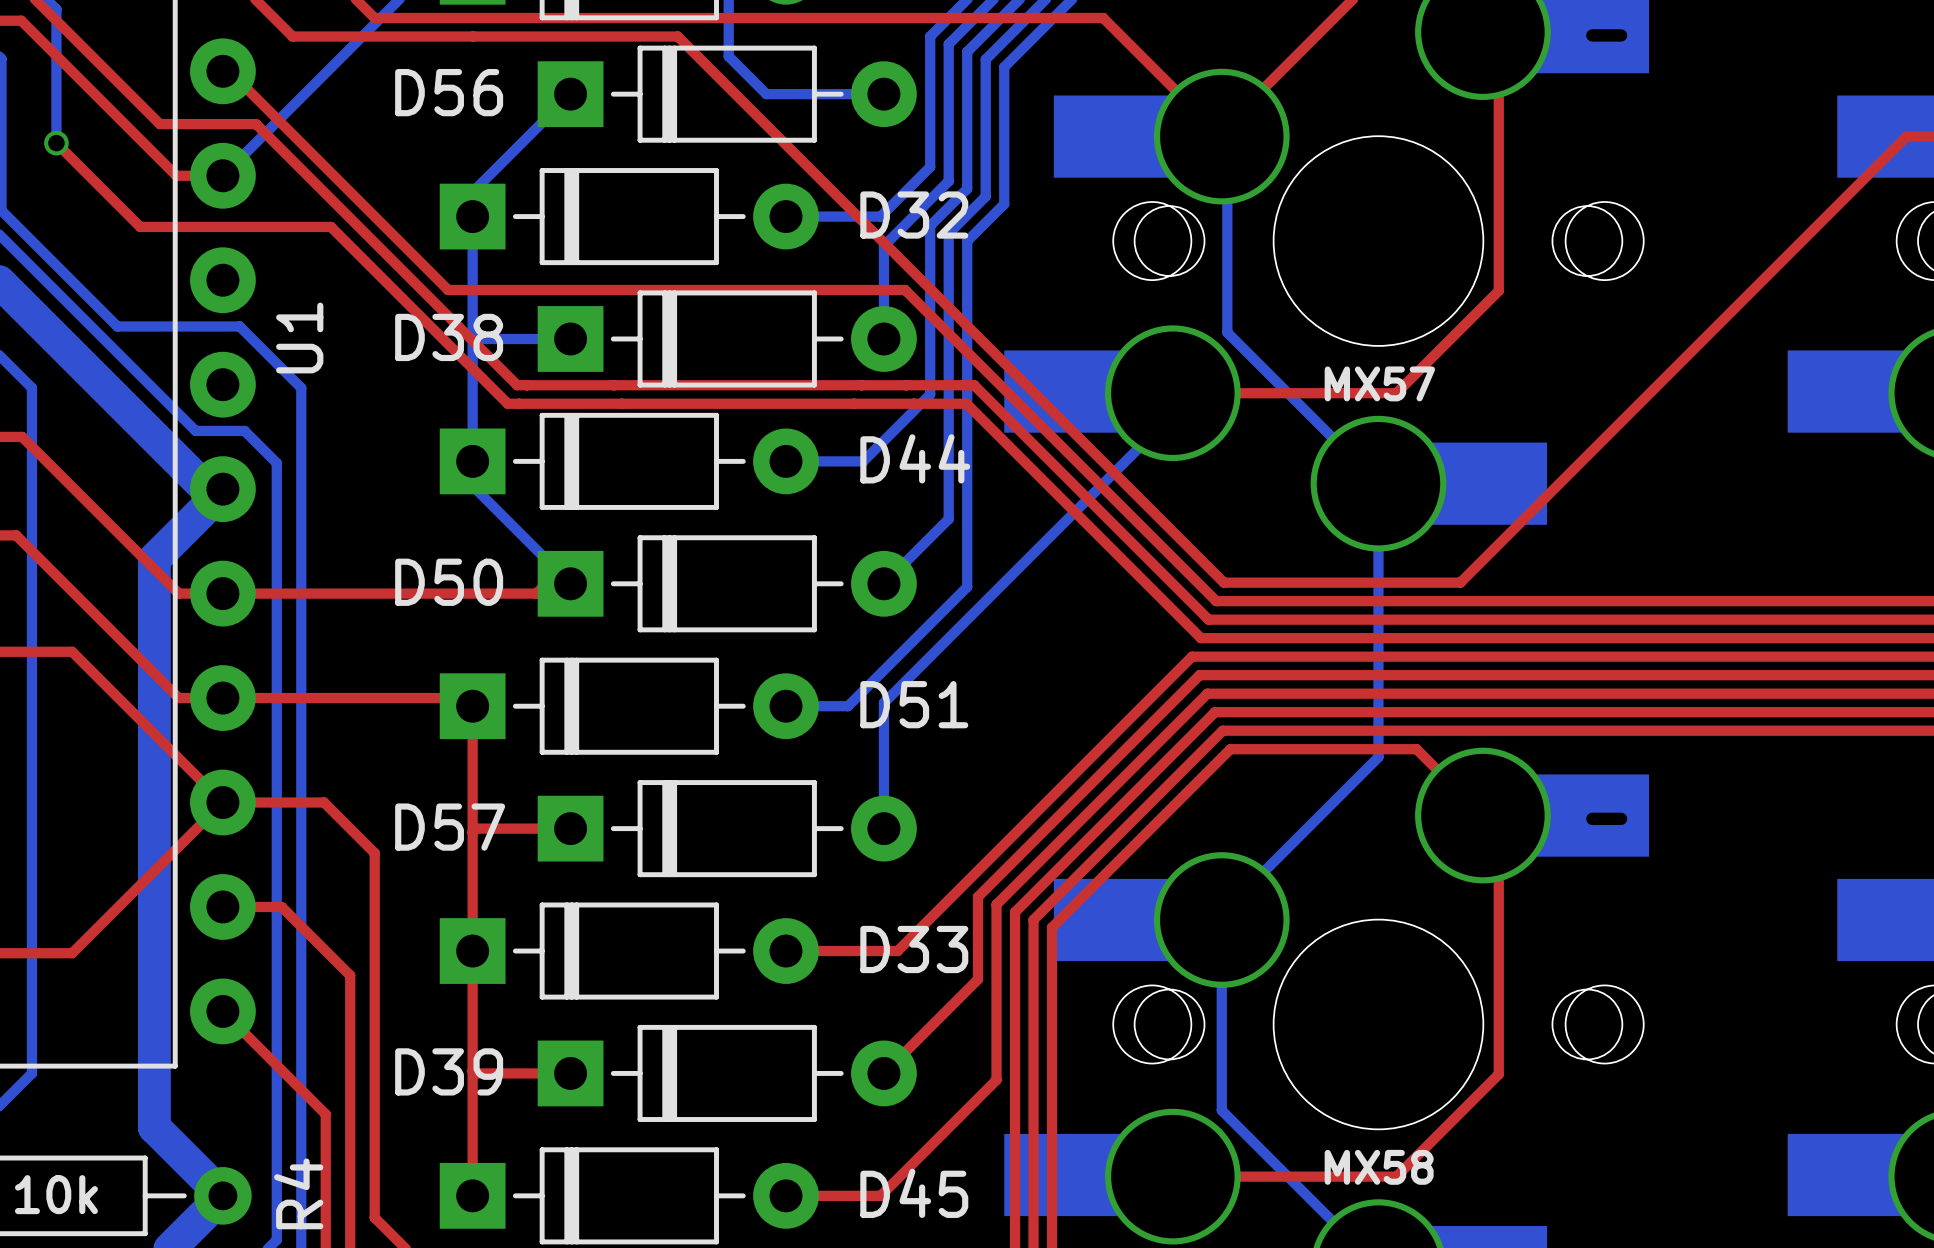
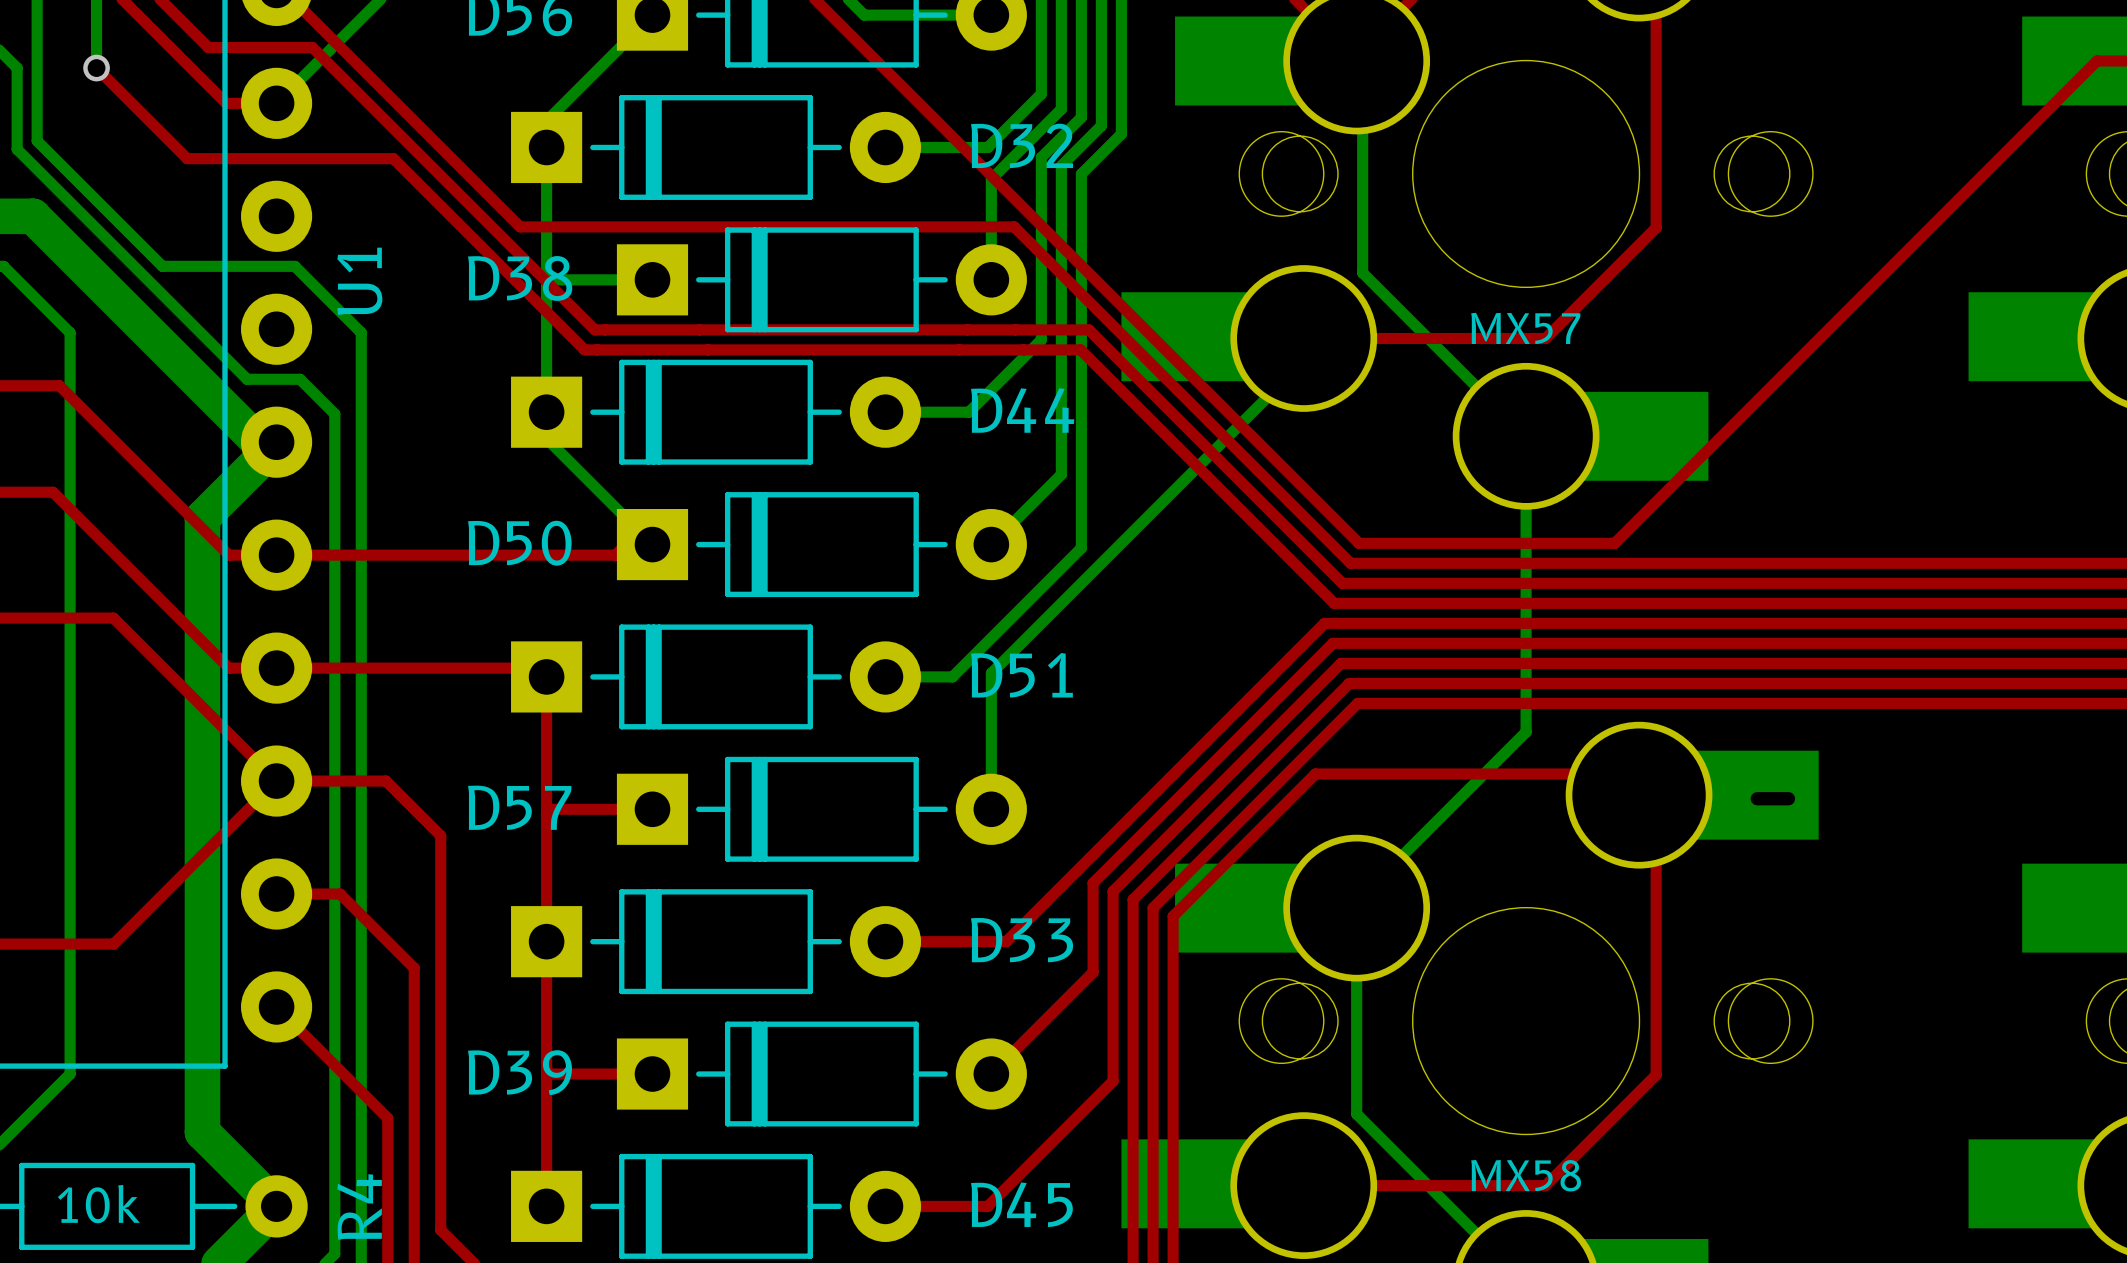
top track: (1183, 795) (1230, 749) (1416, 749) (1463, 795) -> (1315, 773) (1617, 773)

